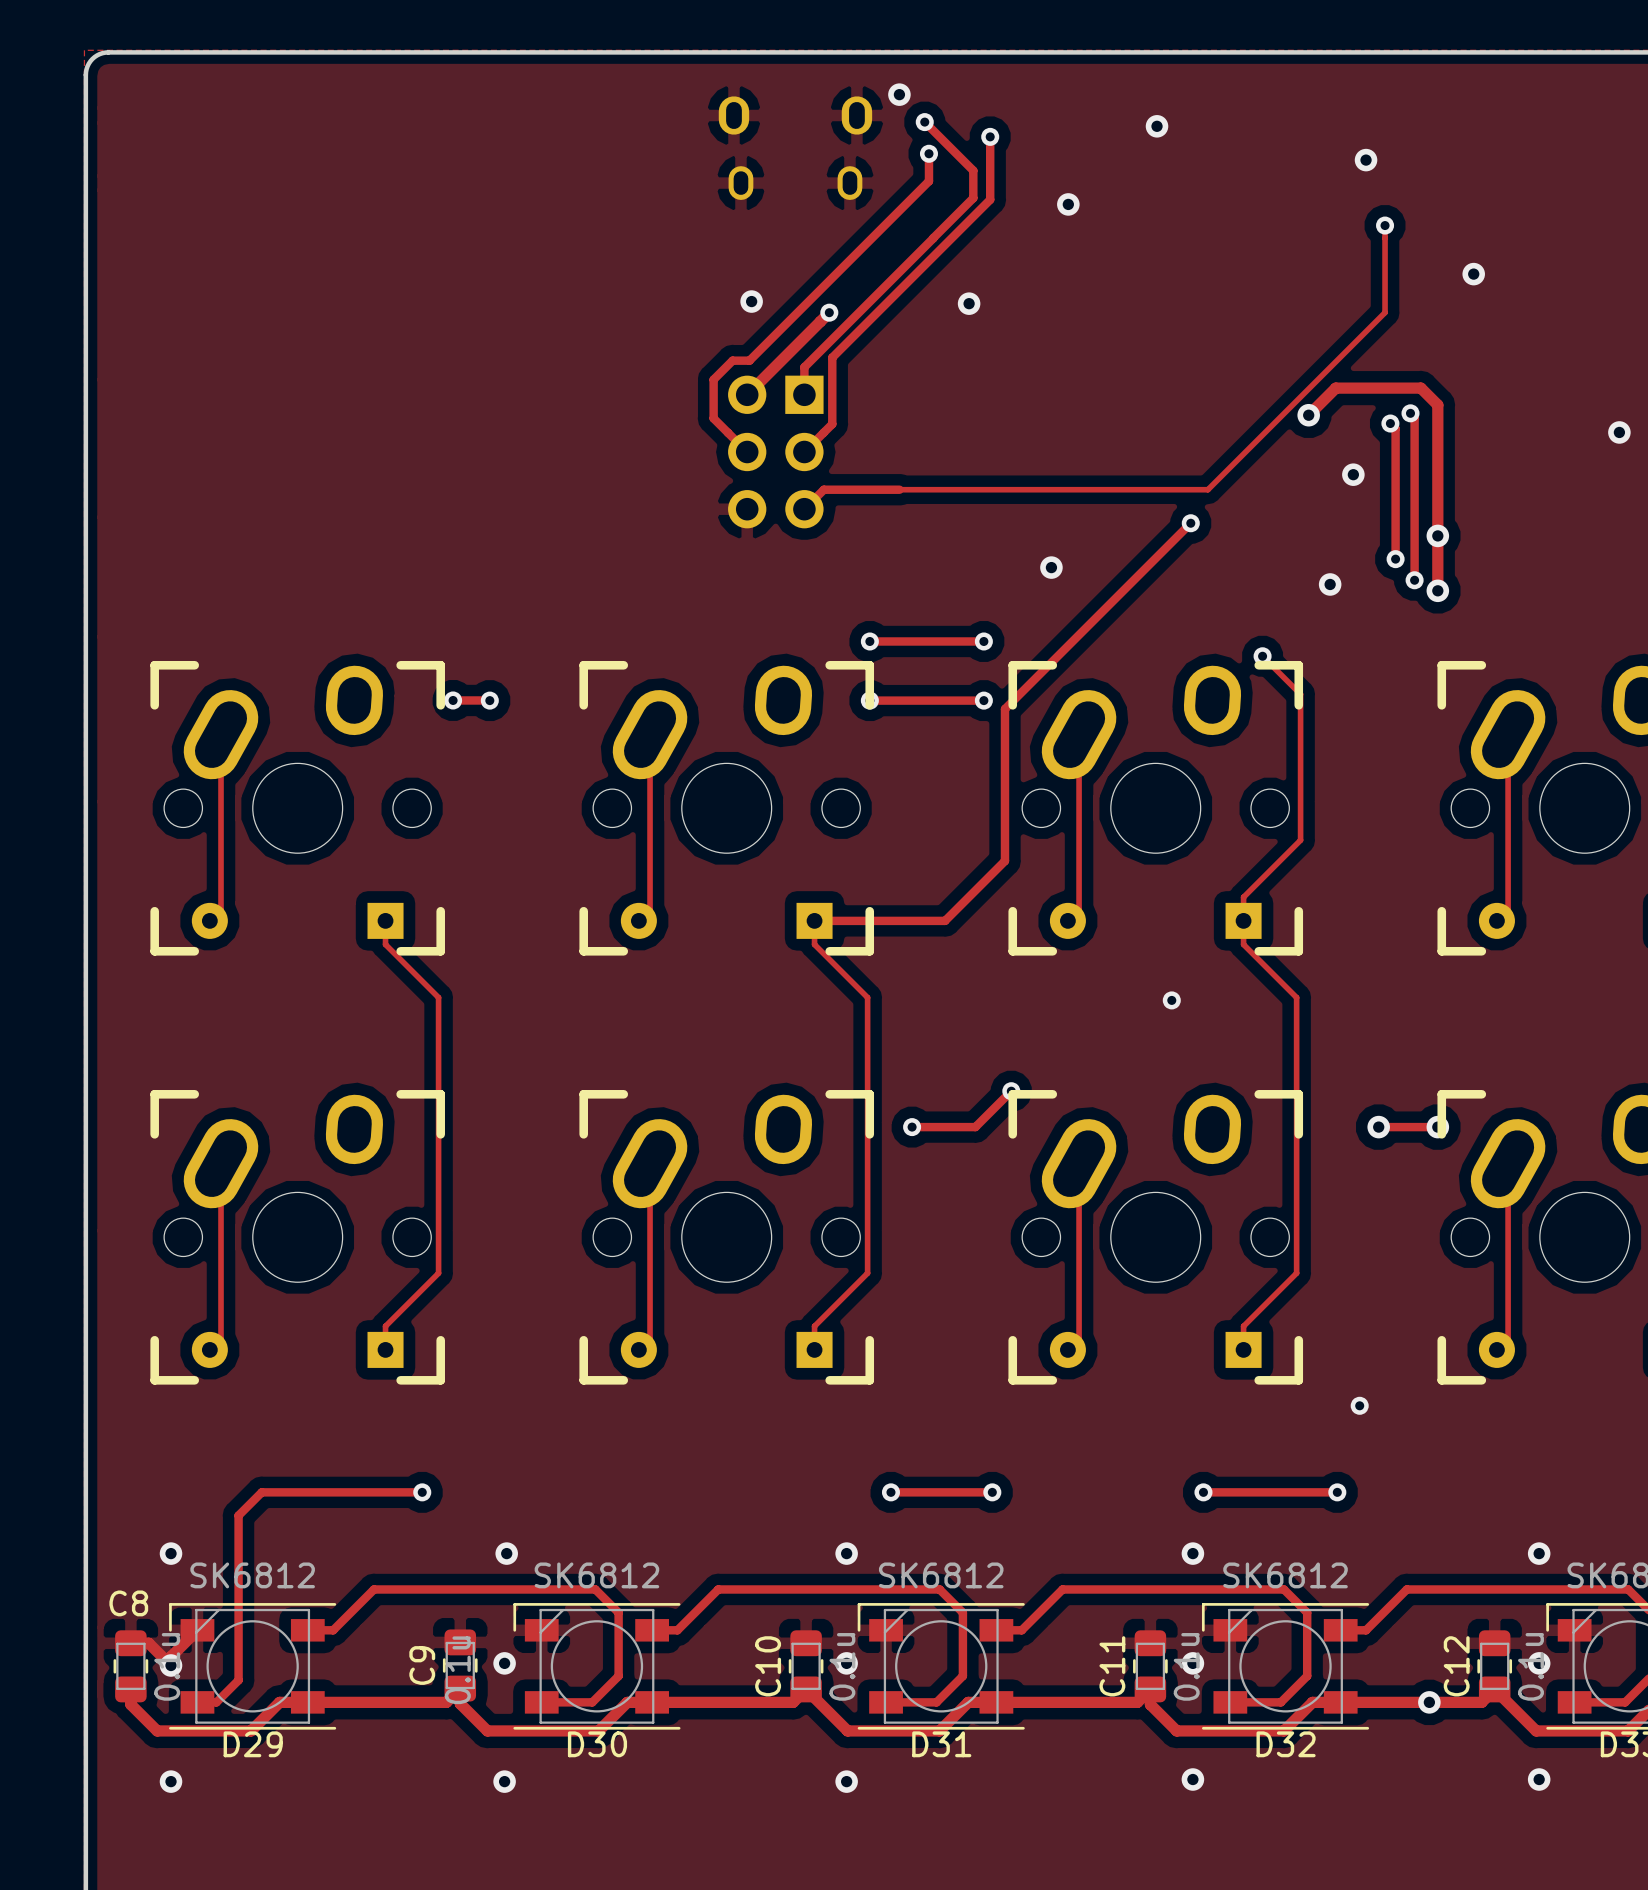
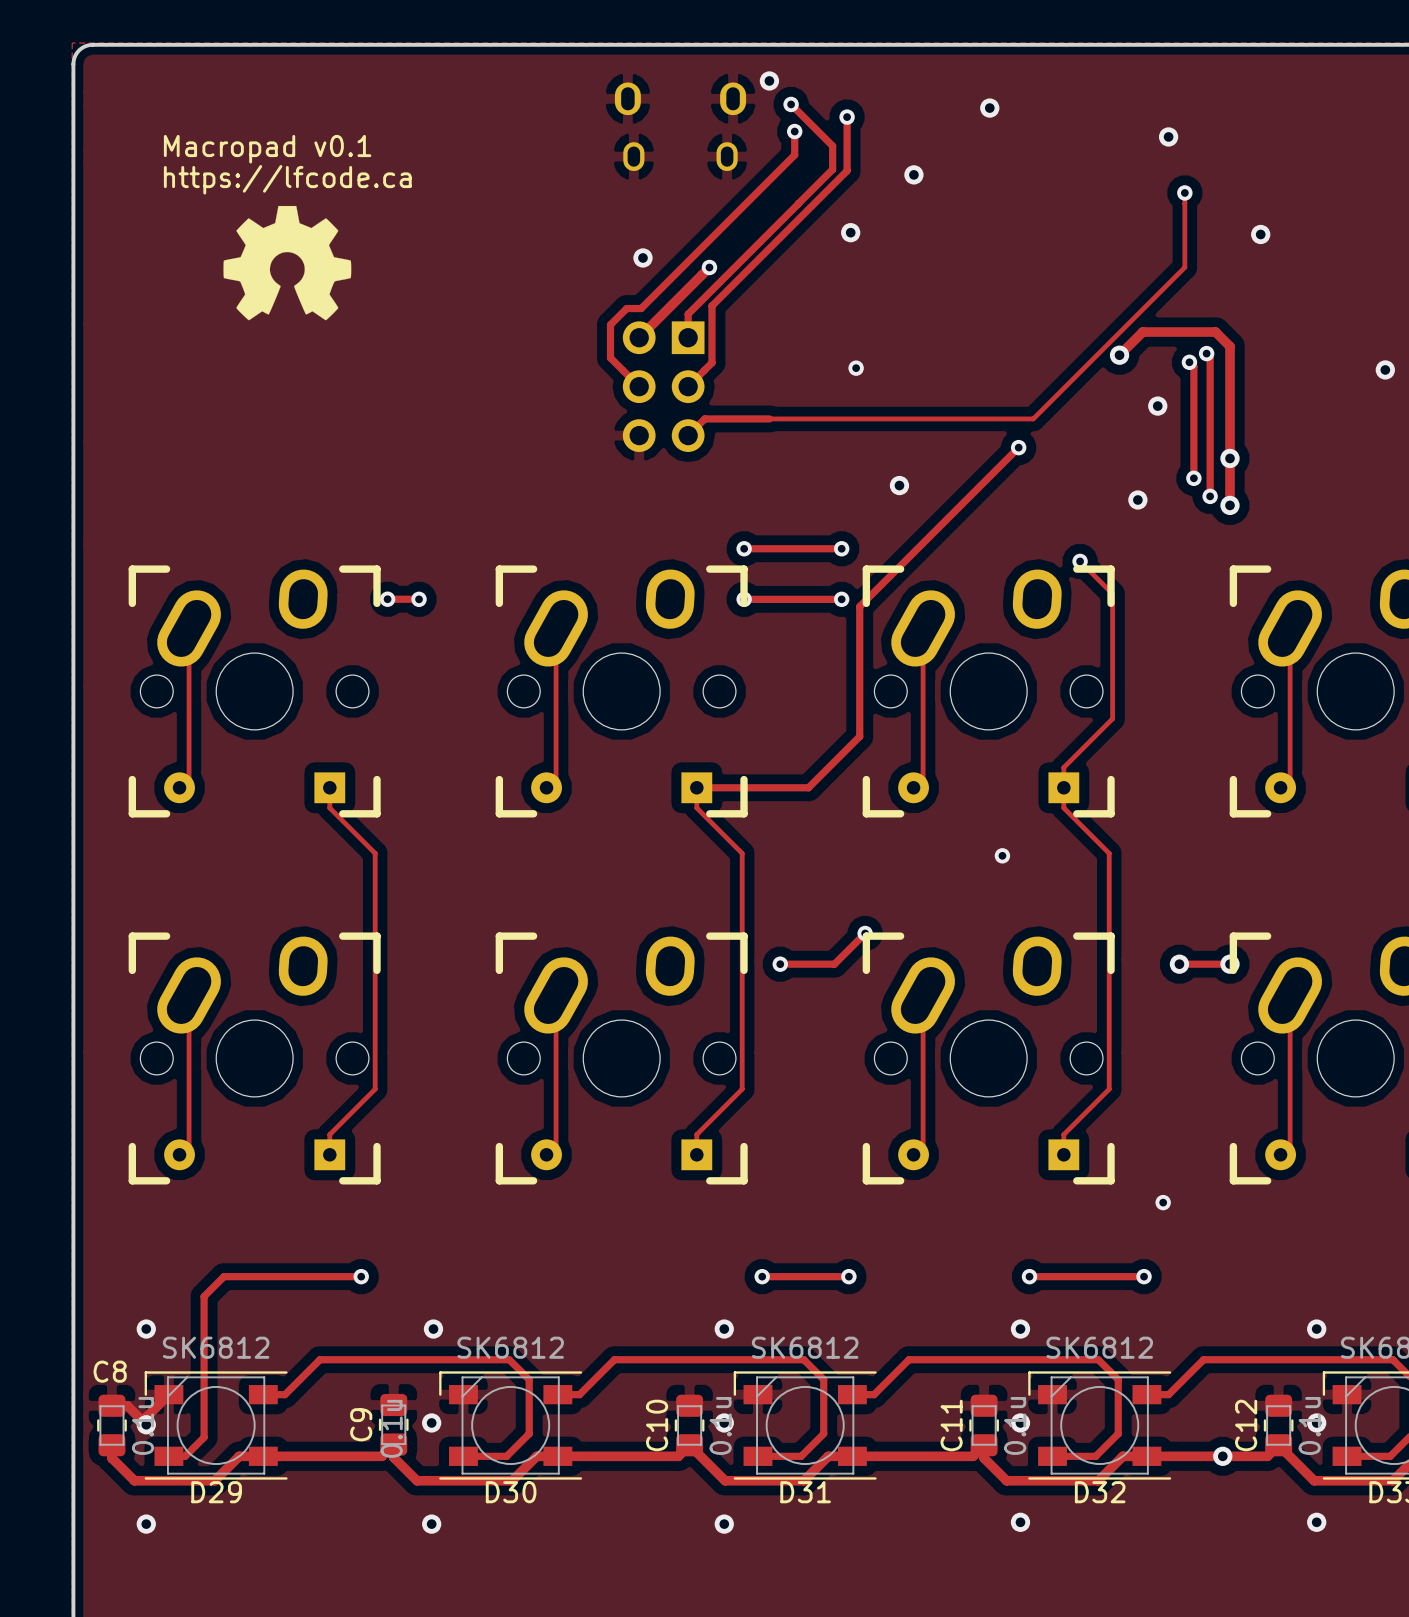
text: none -> Macropad v0.1 (267, 149)
text: none -> https://lfcode.ca (287, 179)
drawing: none -> [223, 205, 352, 321]
via position: (969, 303) -> (850, 232)
via: none -> (856, 368)

